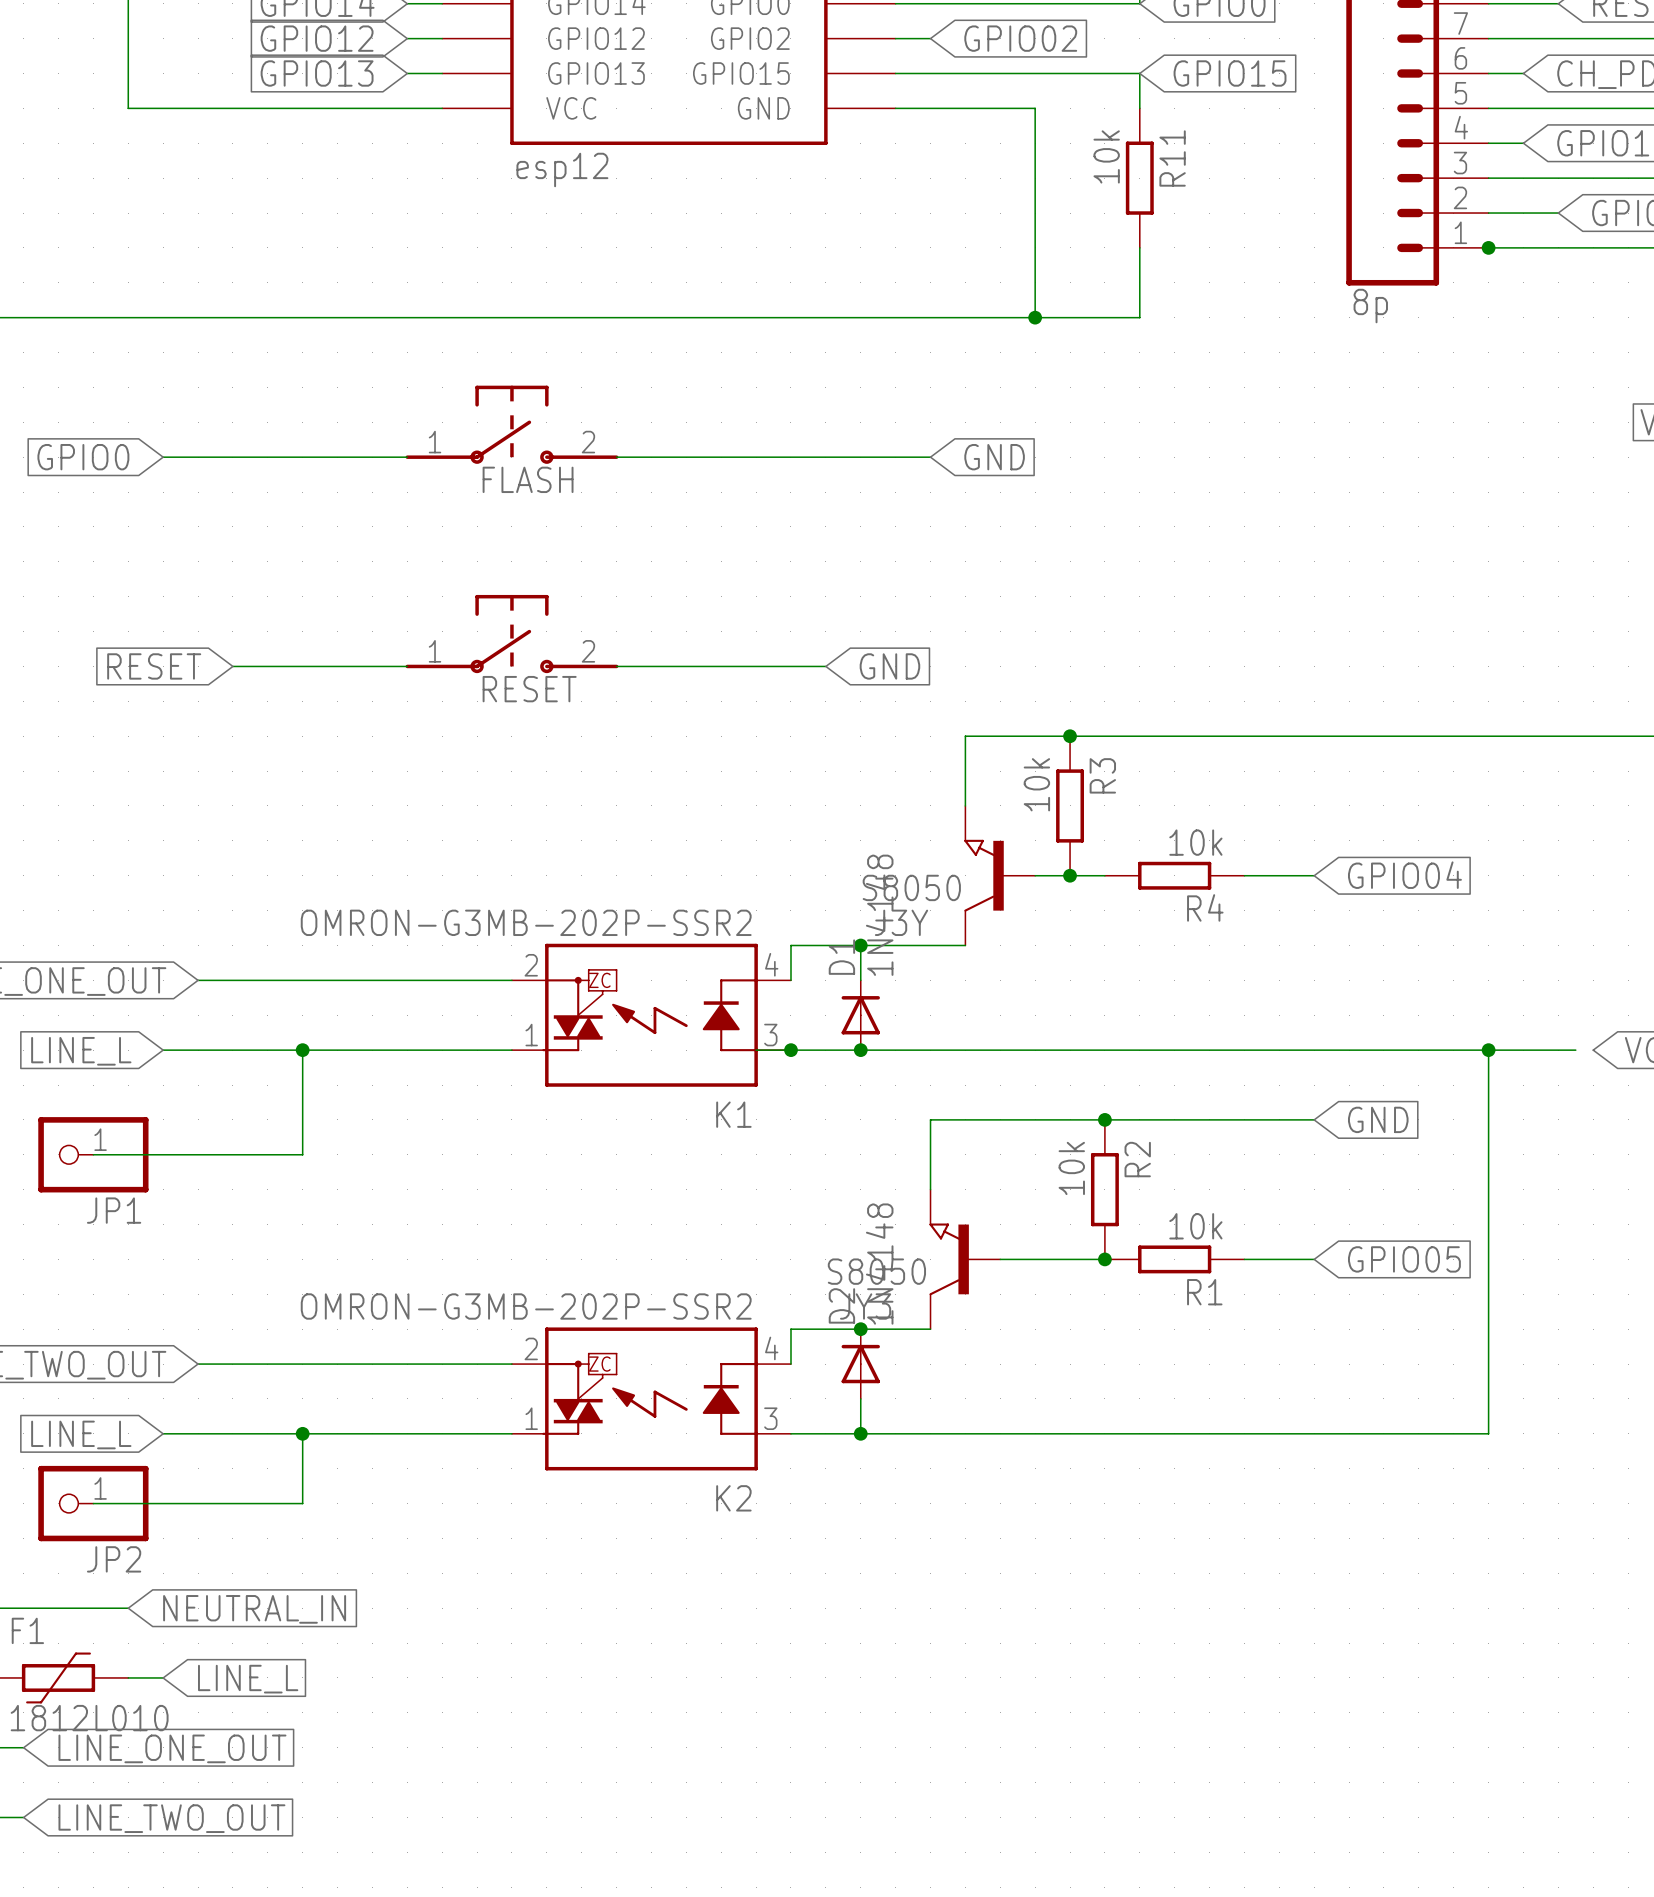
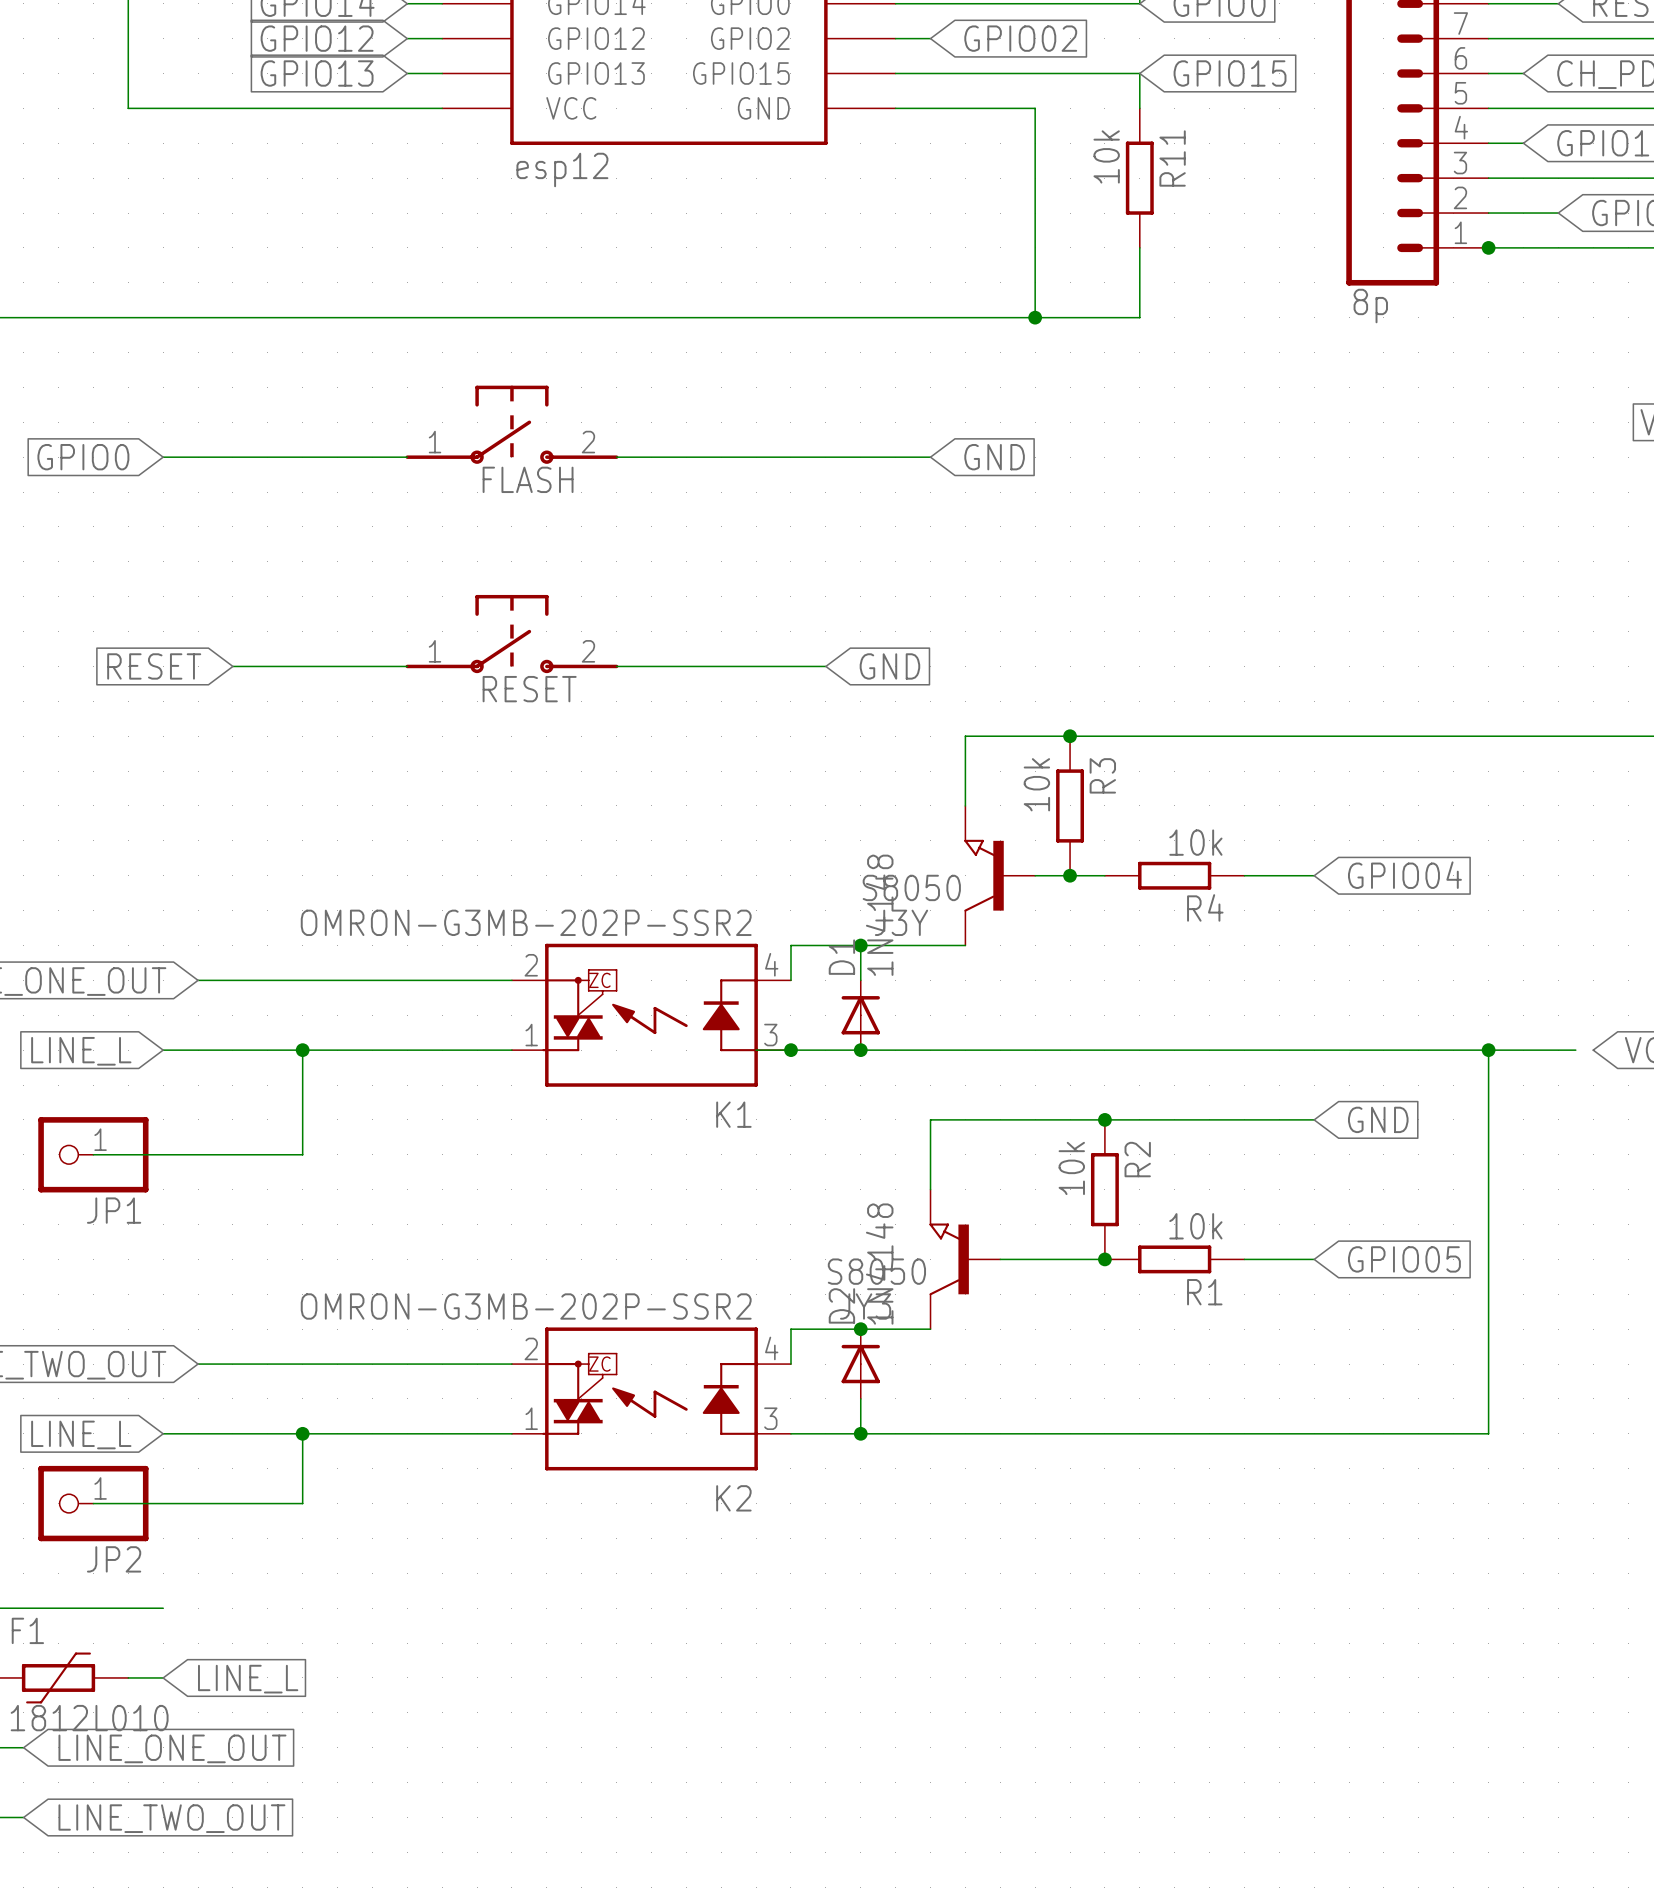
wire: none -> (128, 1608) (163, 1608)
global label: NEUTRAL_IN (254, 1609) -> none

